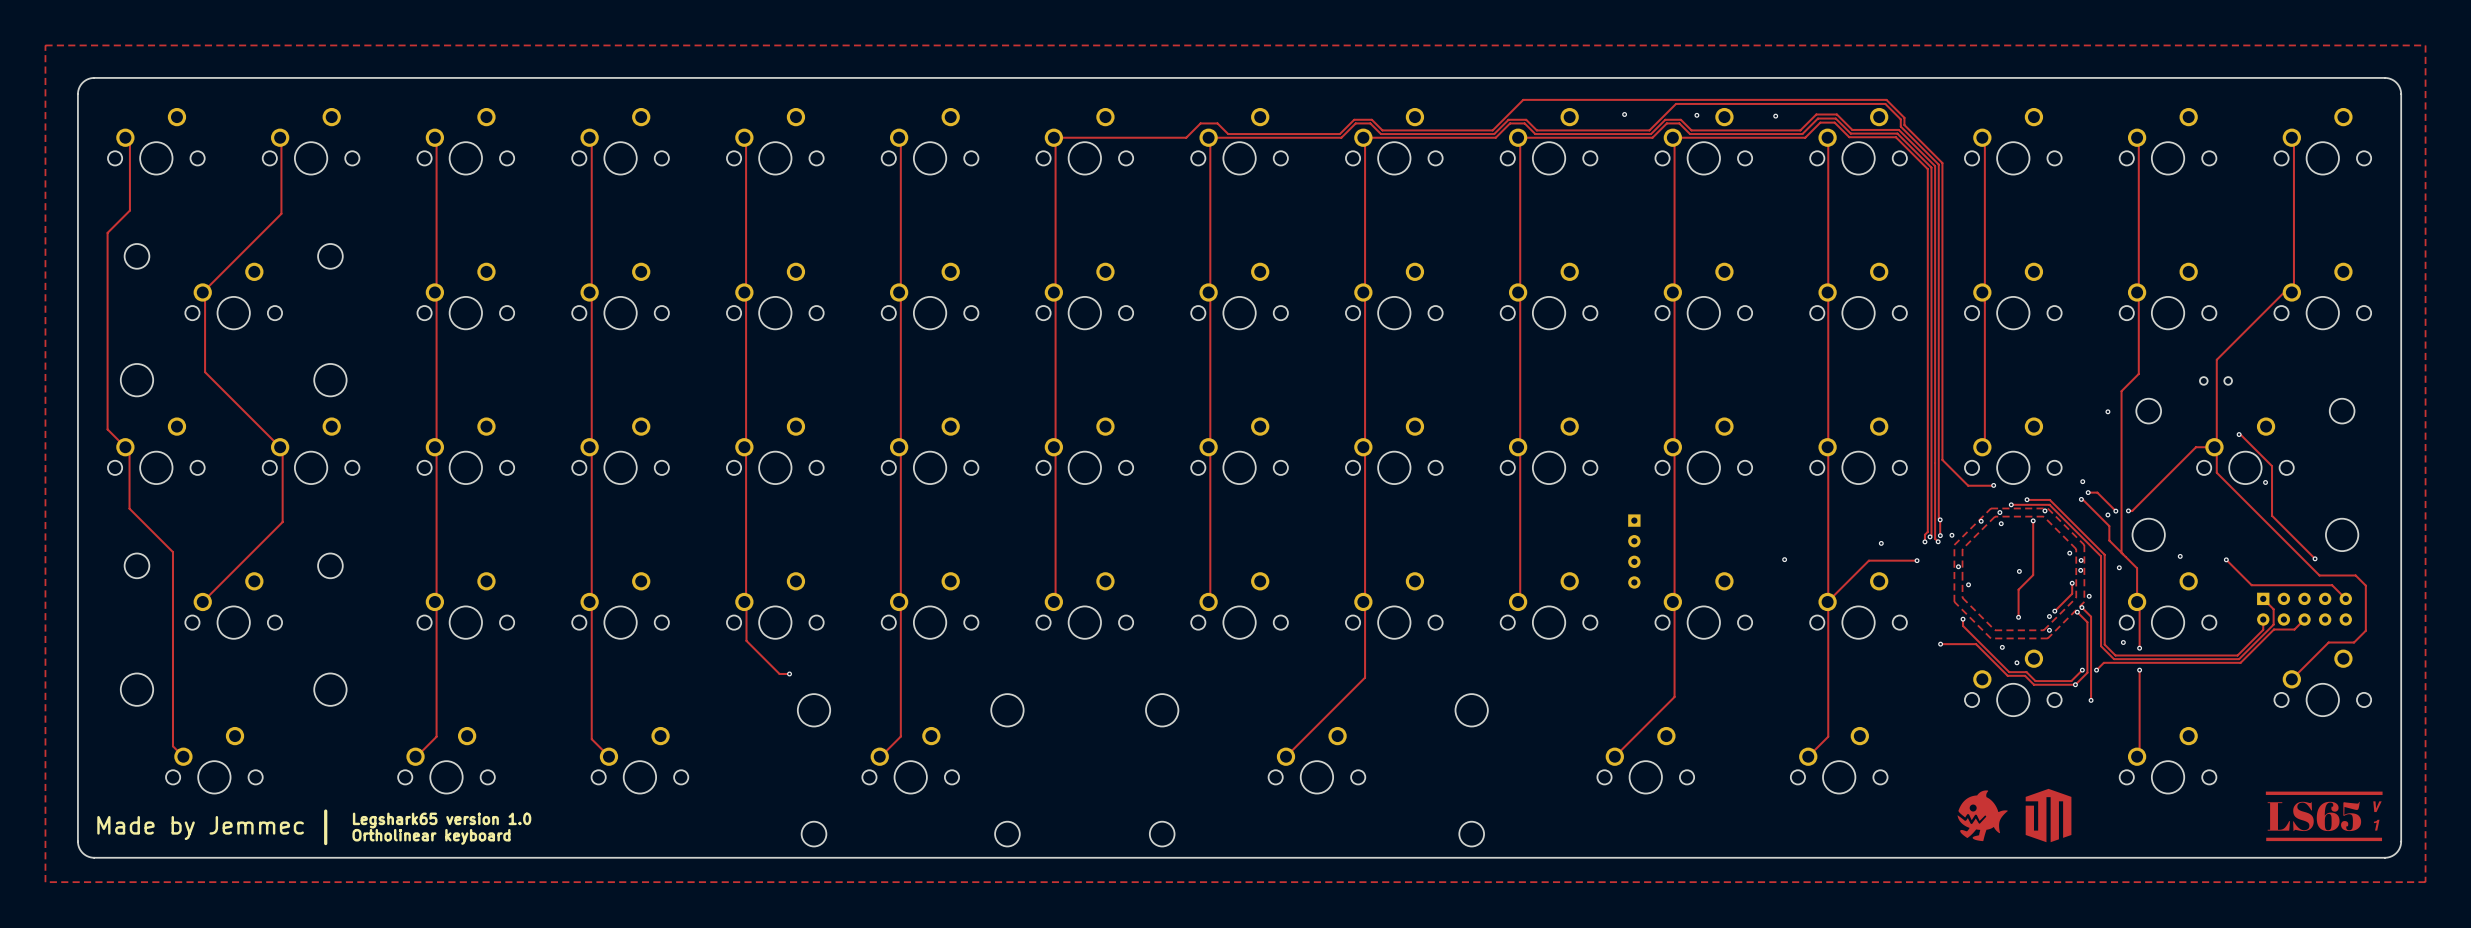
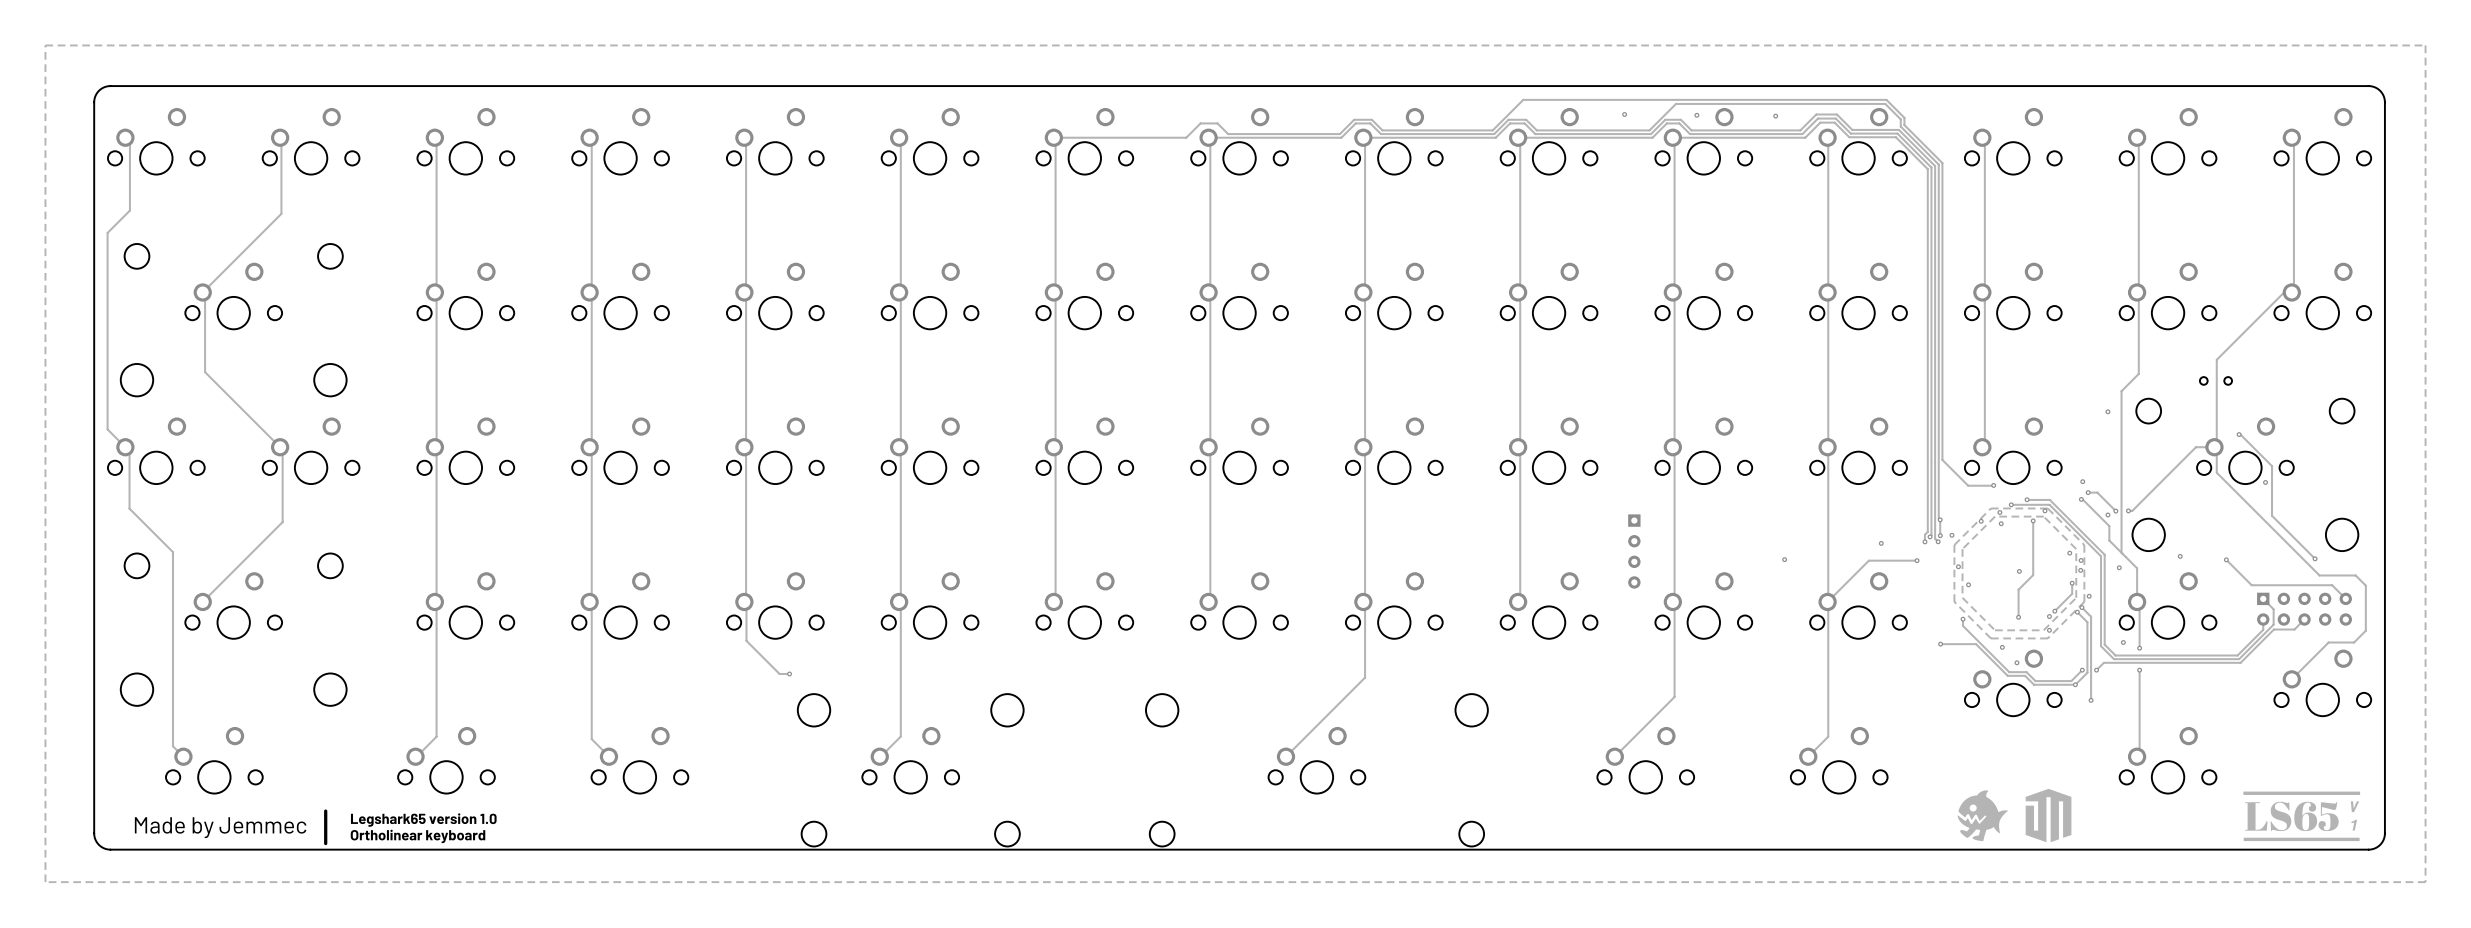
board edge: (94, 77) (2390, 78) (2398, 85) (2401, 94) (2400, 846) (2395, 854) (2384, 857) (88, 856) (80, 850) (77, 841) (77, 94) (82, 82) (94, 77) -> (110, 86) (98, 90) (94, 102) (94, 833) (96, 842) (105, 848) (2368, 849) (2377, 847) (2384, 838) (2384, 102) (2381, 92) (2374, 86) (110, 86)
drawing position: (2324, 816) -> (2301, 816)

